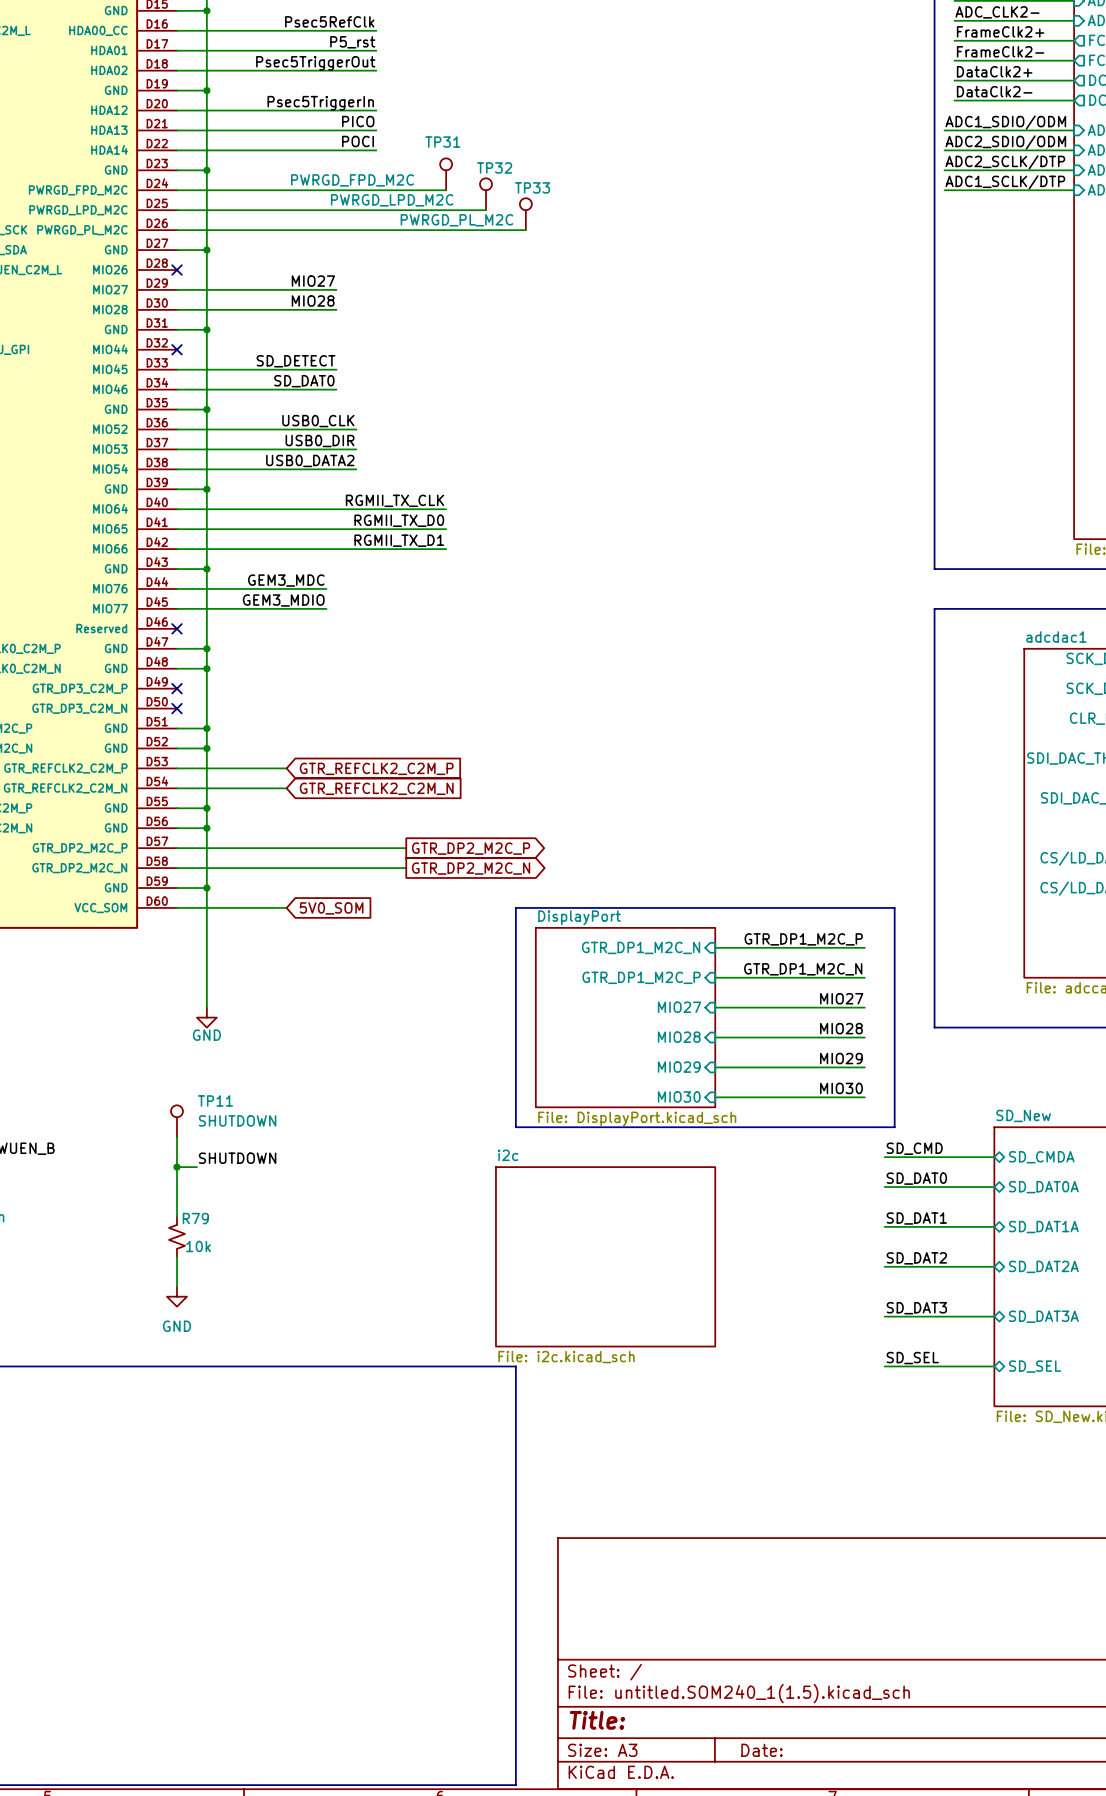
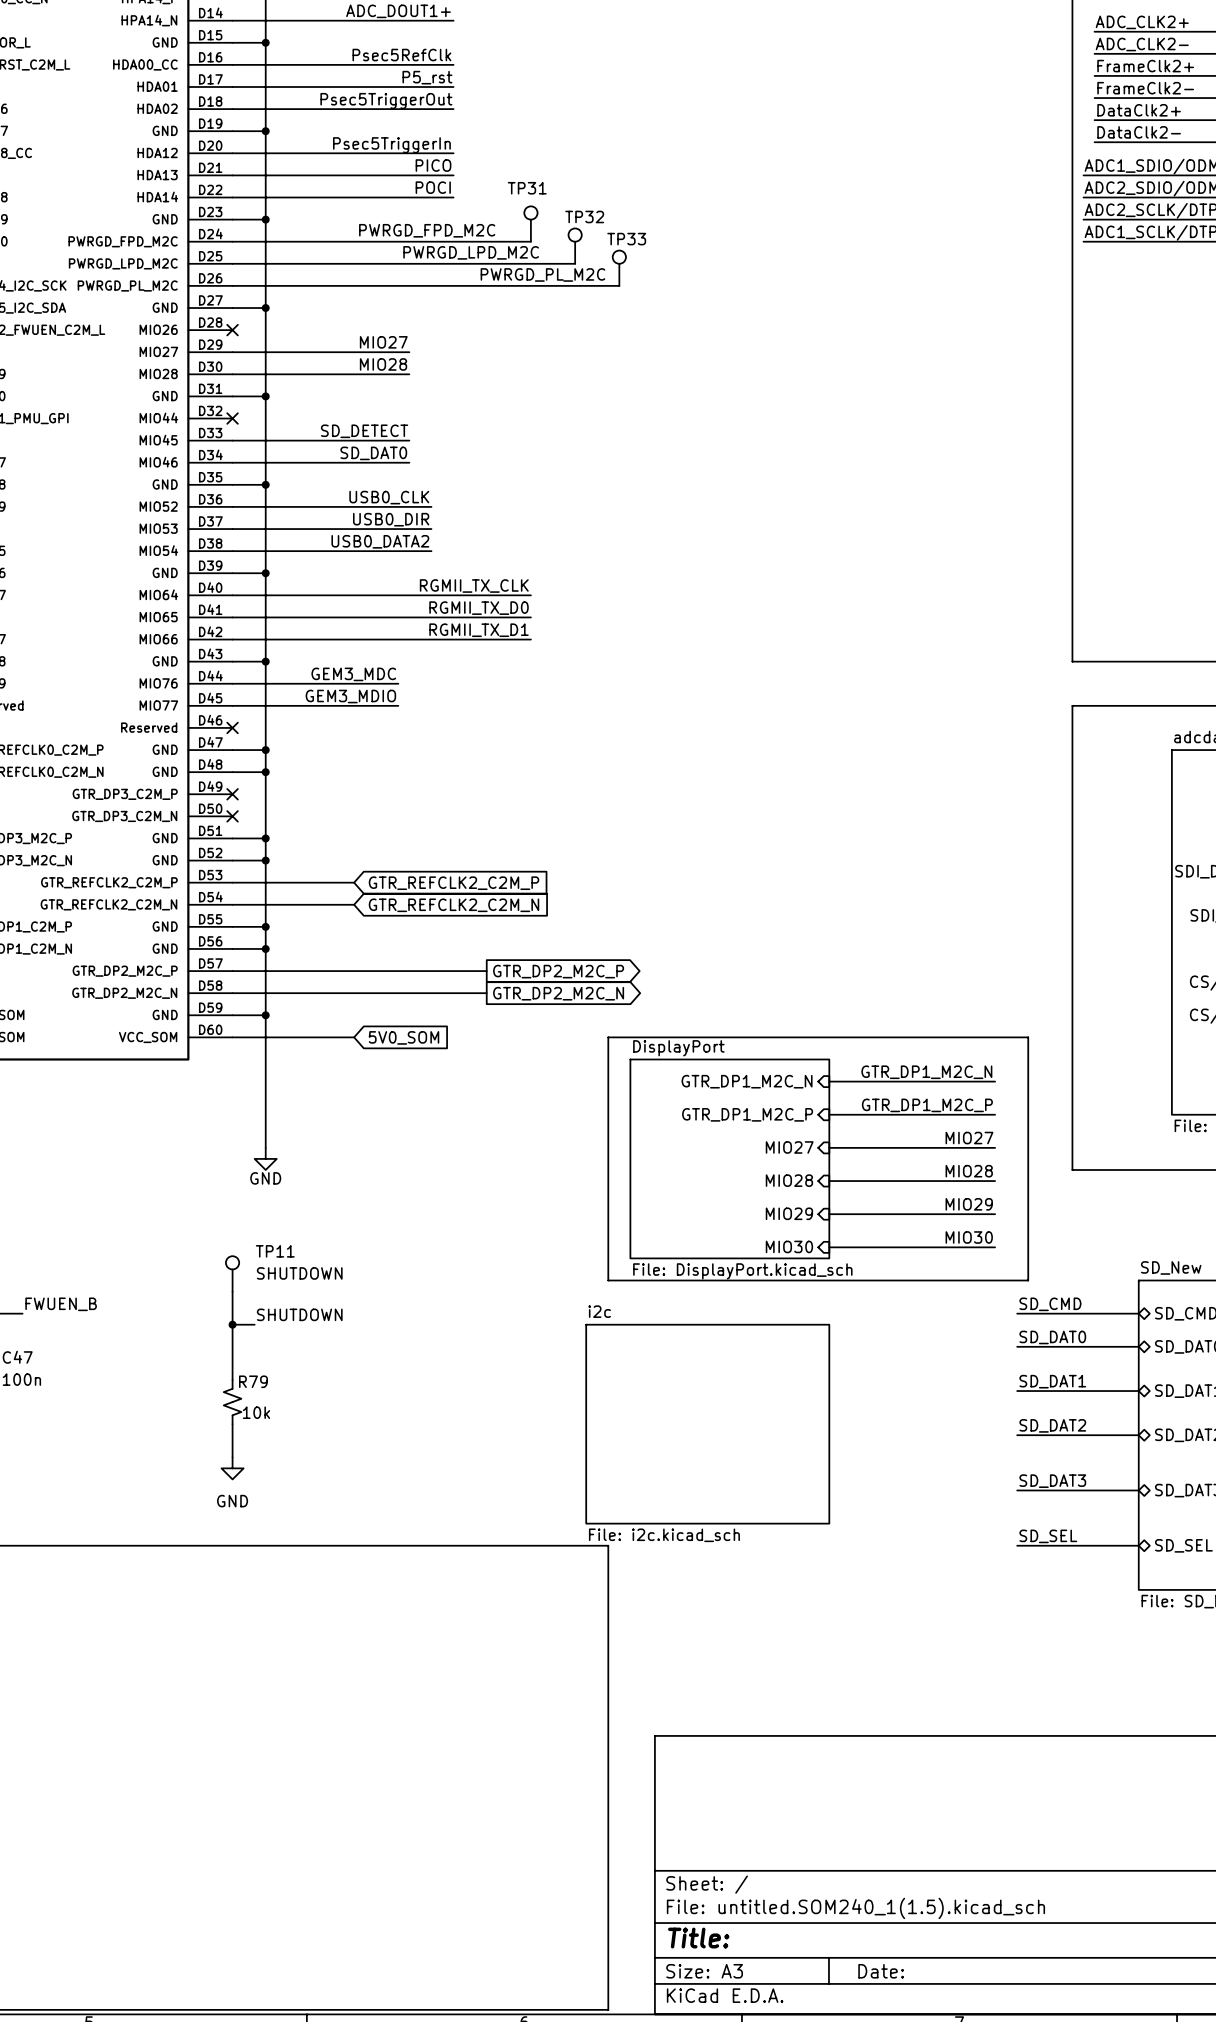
label: GTR_DP1_M2C_P (803, 939) -> GTR_DP1_M2C_N (926, 1072)
label: GTR_DP1_M2C_N (803, 969) -> GTR_DP1_M2C_P (927, 1105)

